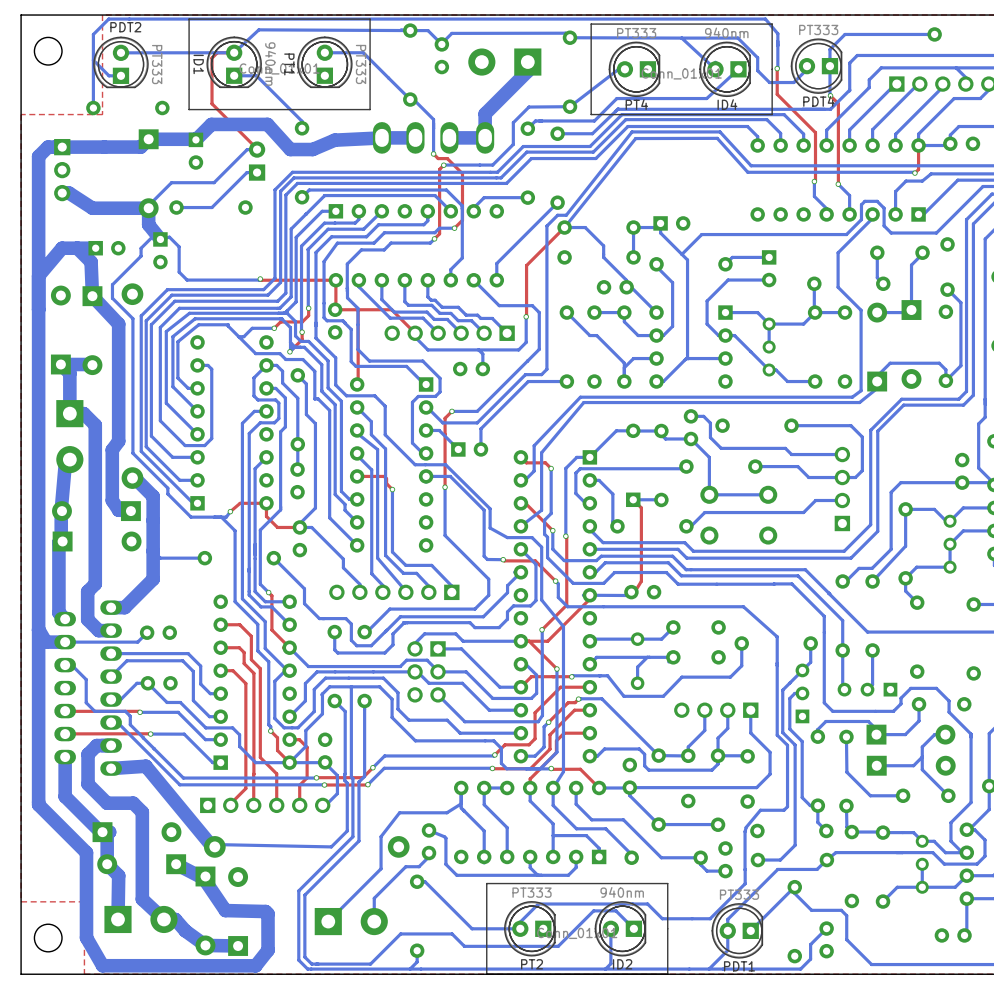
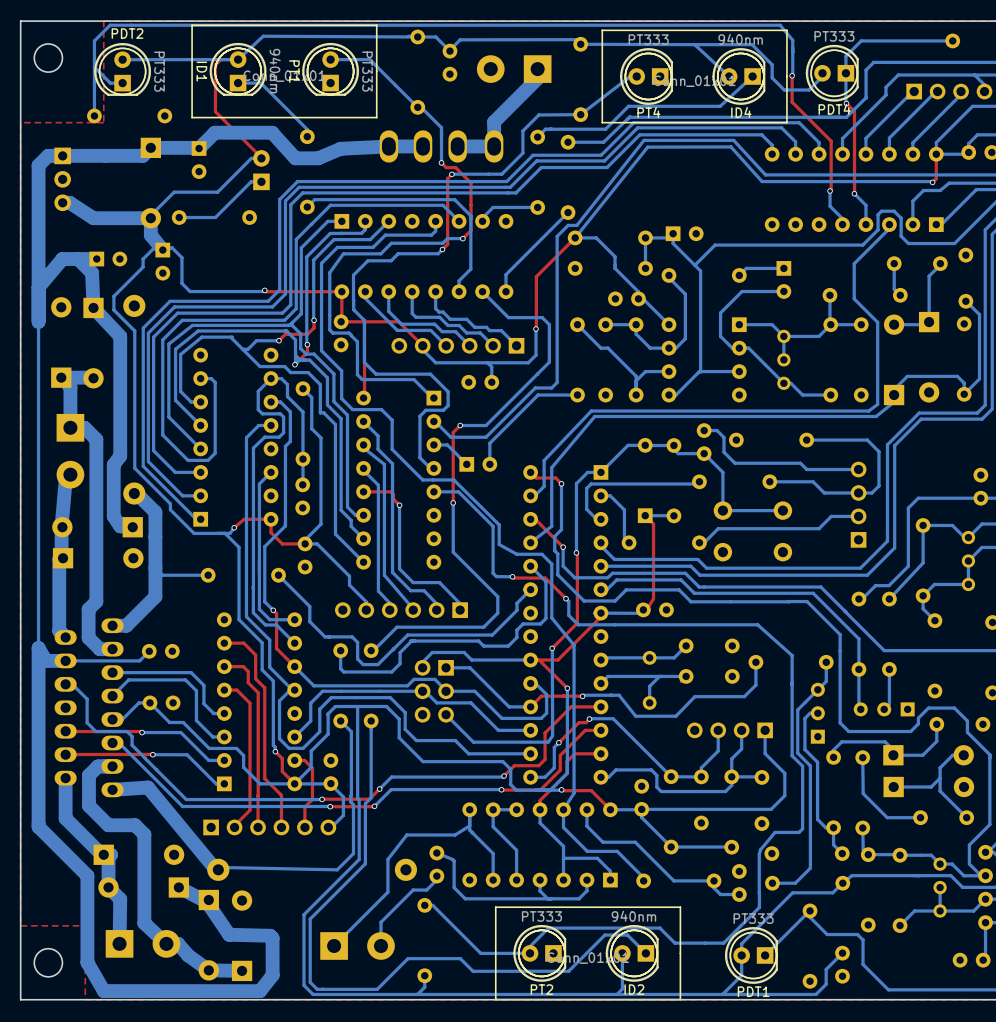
bottom track width: thick (38, 309) (38, 629) -> thin (38, 321) (38, 648)

